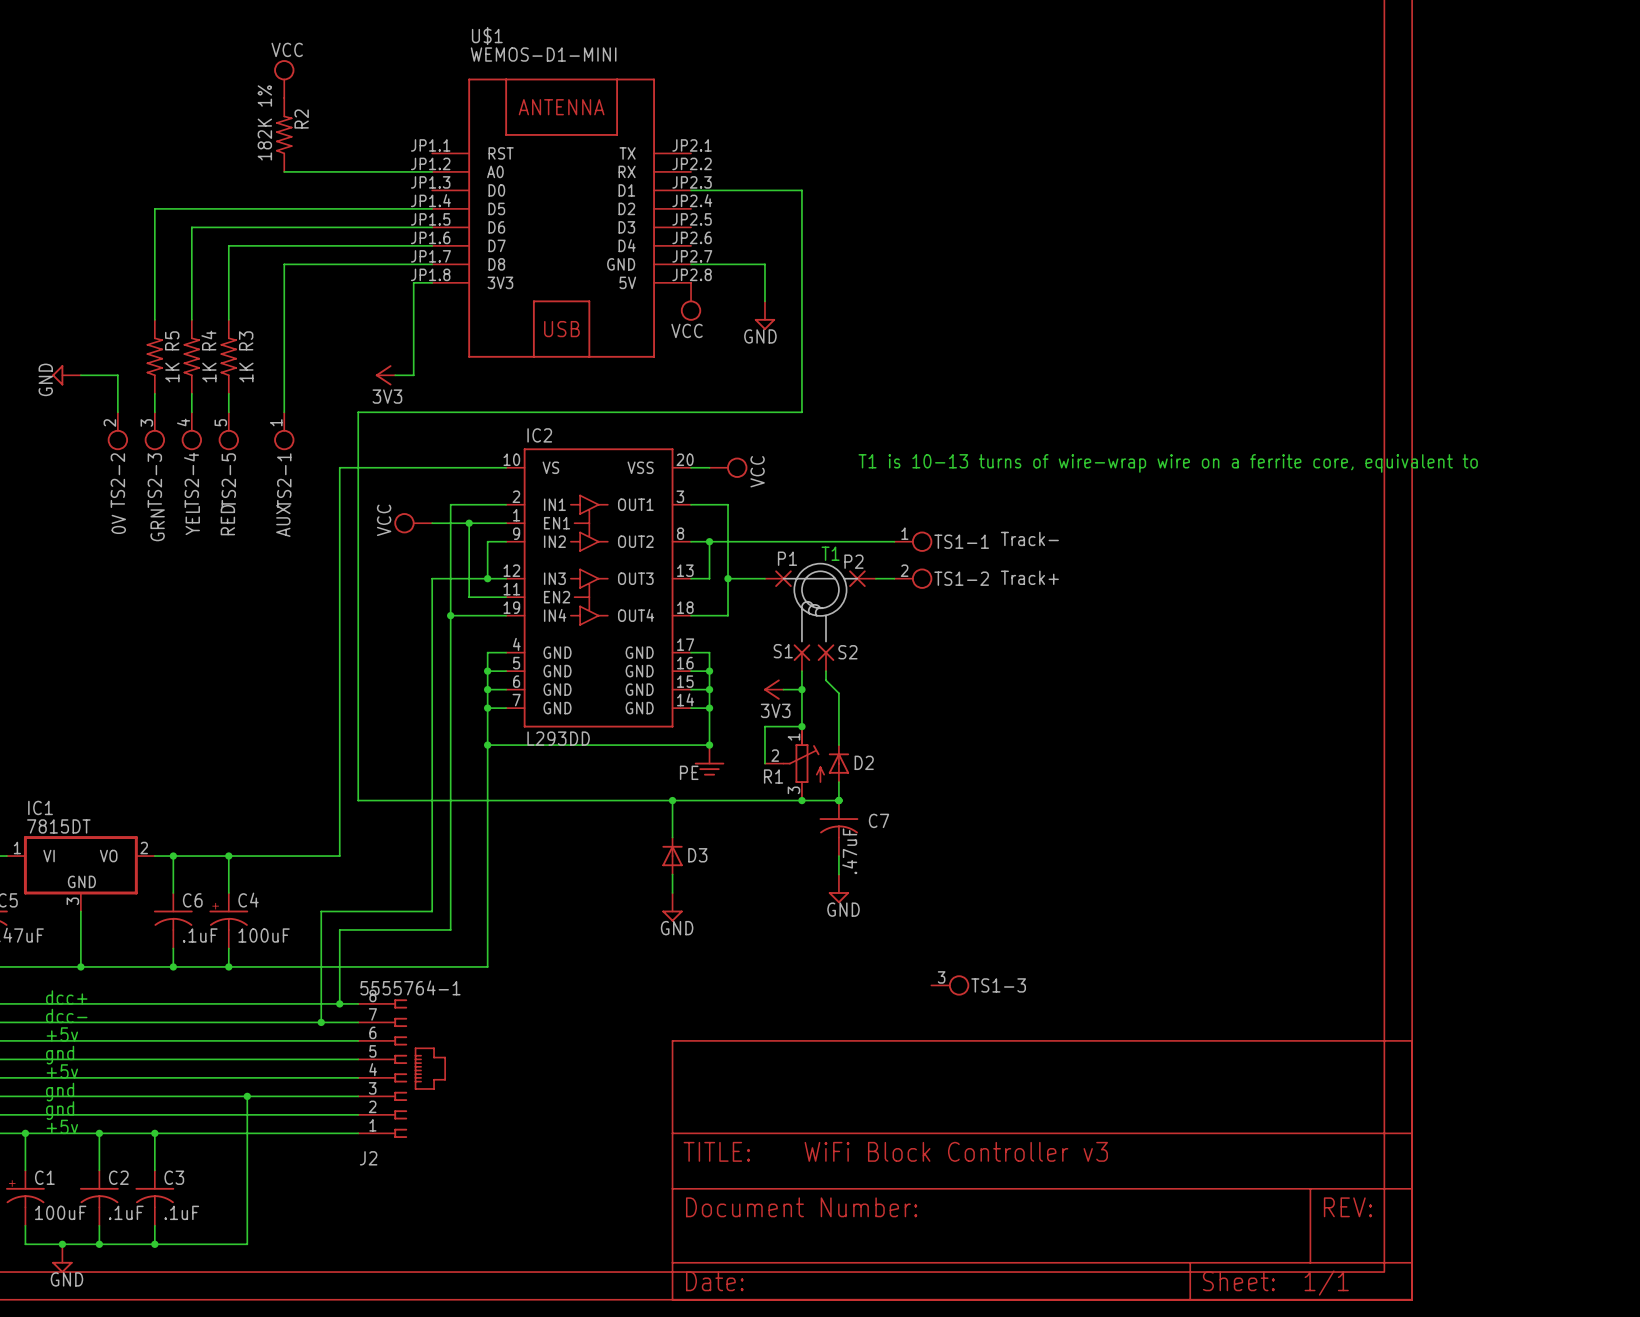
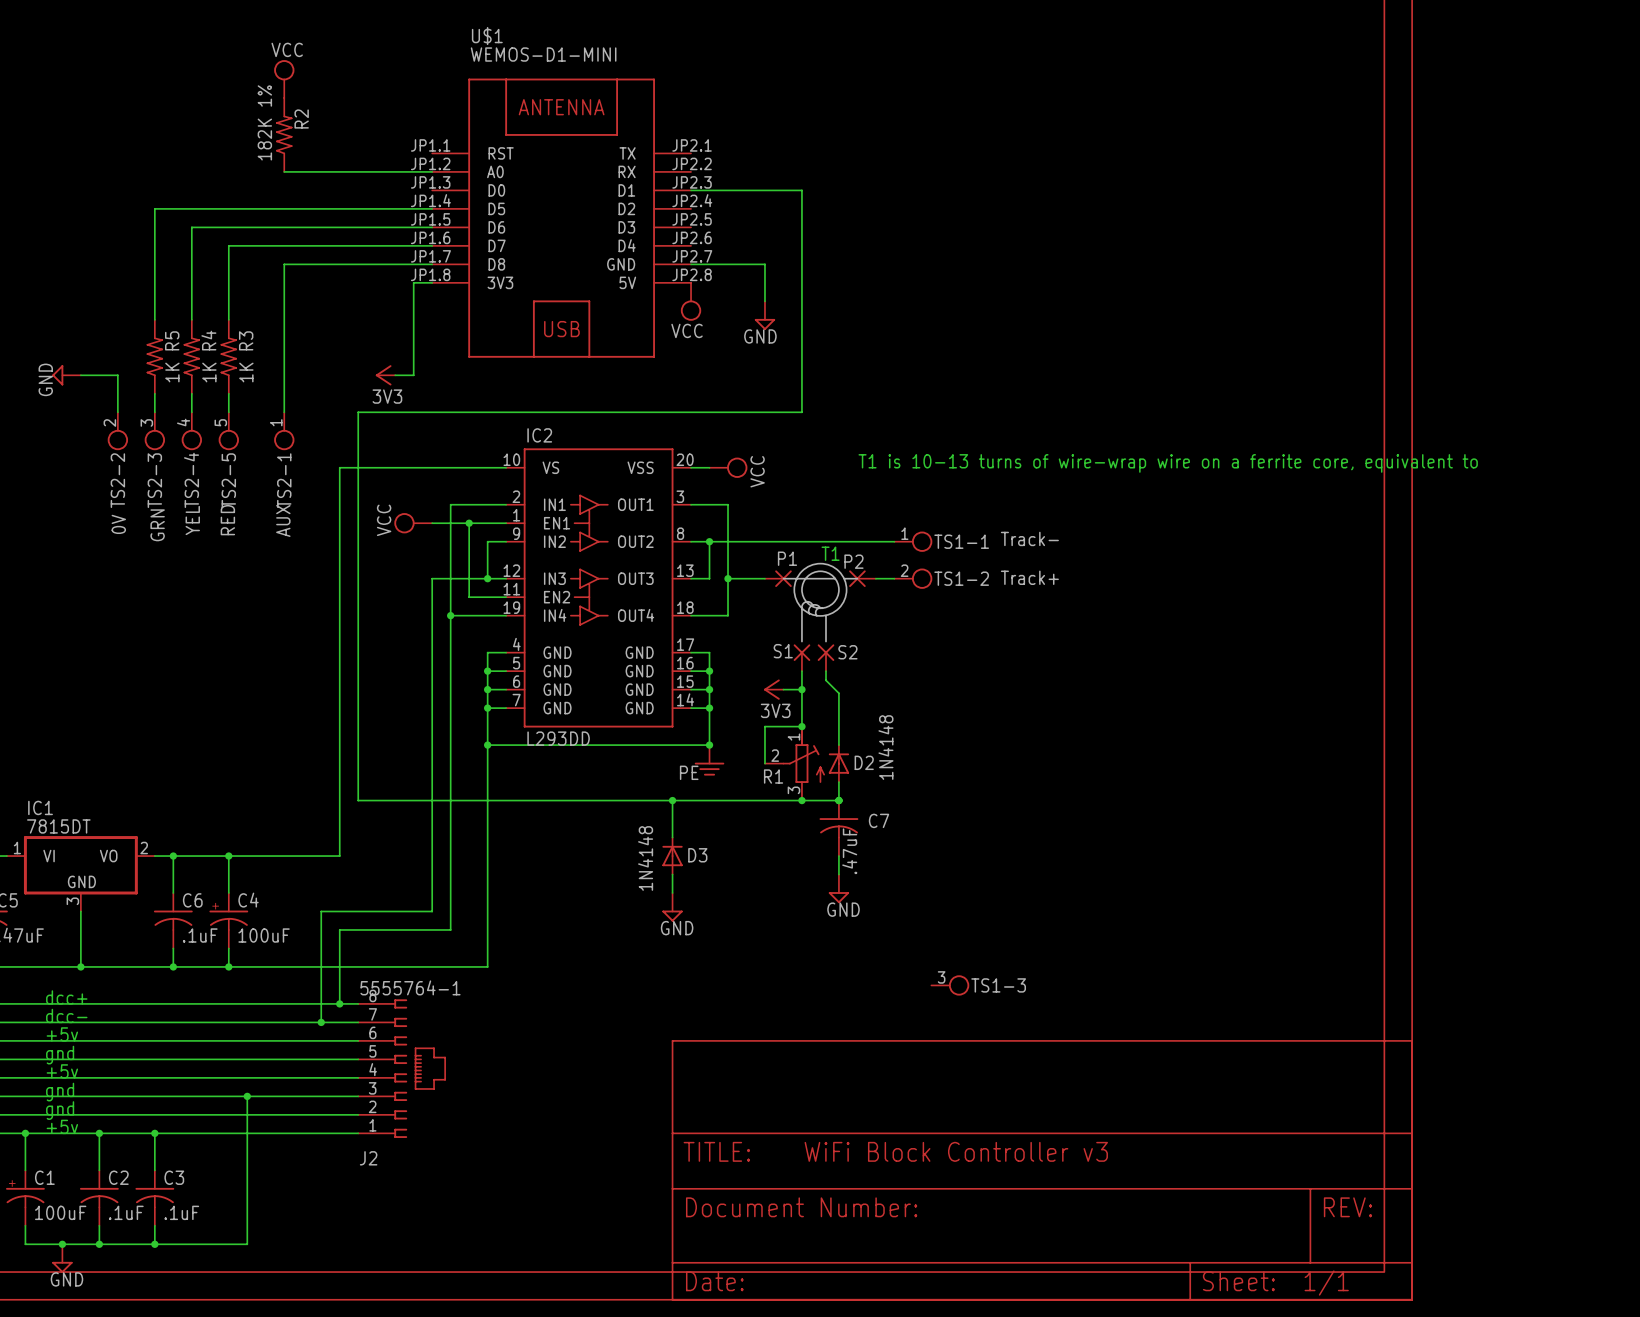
D2 value: none -> 1N4148 (885, 747)
D3 value: none -> 1N4148 (645, 858)

